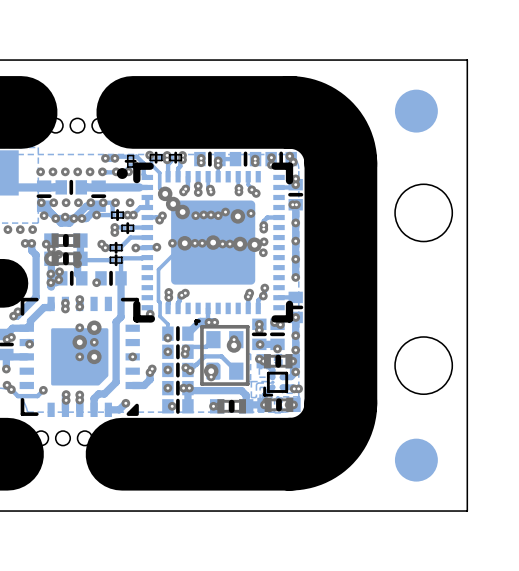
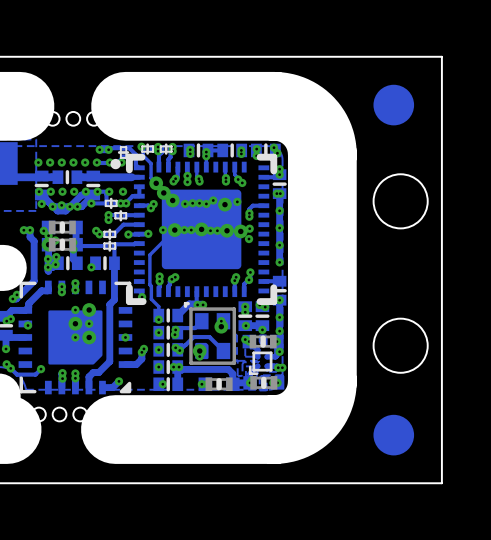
via: (7, 229) -> none
via: (20, 229) -> none
via: (32, 229) -> none

